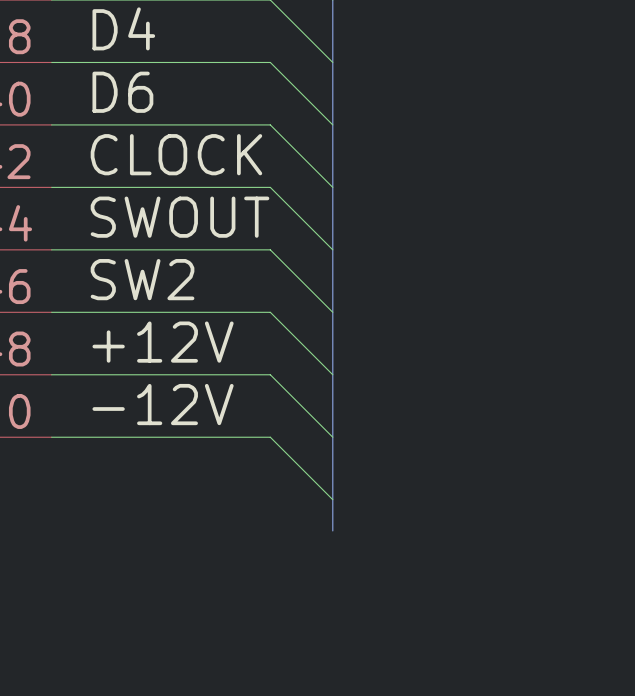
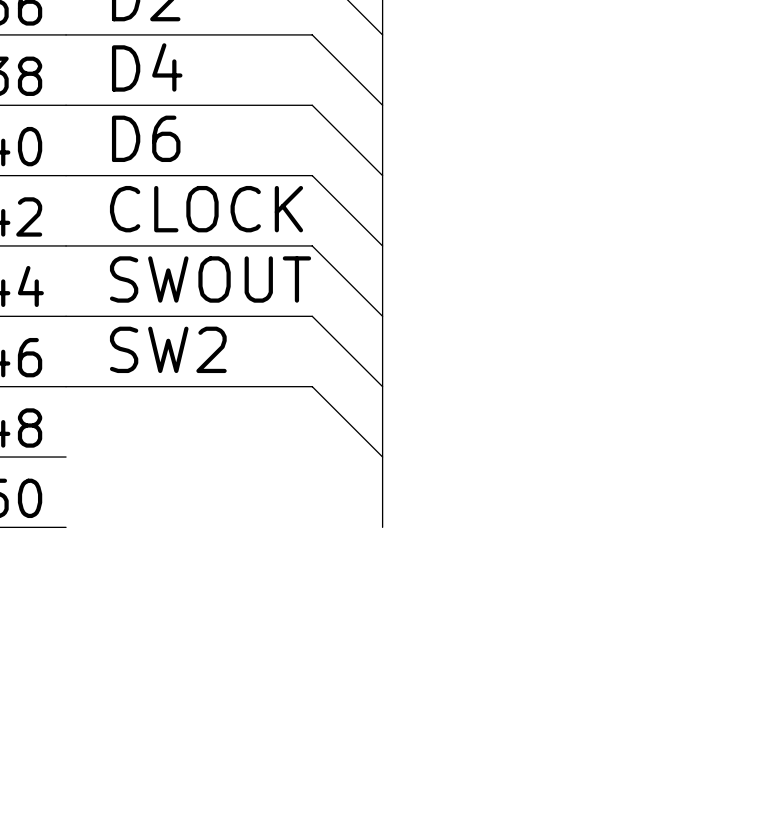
label: +12V (163, 342) -> none
wire: (51, 374) (270, 374) (332, 437) -> none
label: -12V (163, 404) -> none
wire: (51, 437) (270, 437) (332, 499) -> none
bus: (332, 437) (332, 530) -> none

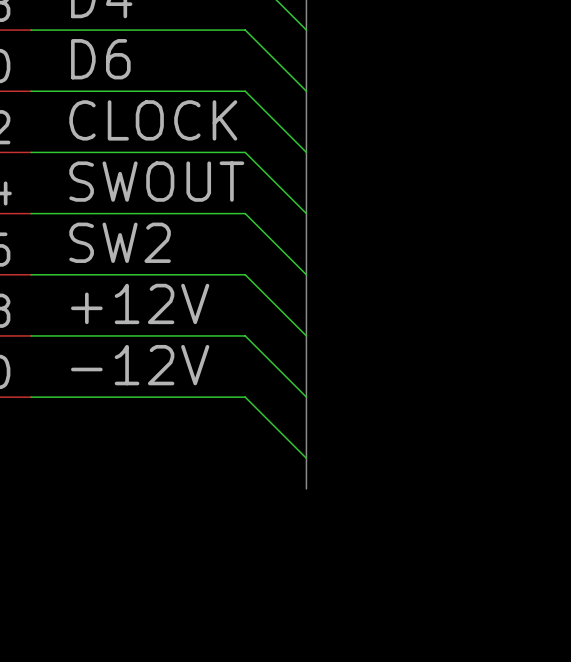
label: none -> +12V (140, 303)
wire: none -> (31, 335) (245, 335) (306, 397)
label: none -> -12V (140, 365)
wire: none -> (31, 397) (245, 397) (306, 458)
bus: none -> (306, 397) (306, 488)

